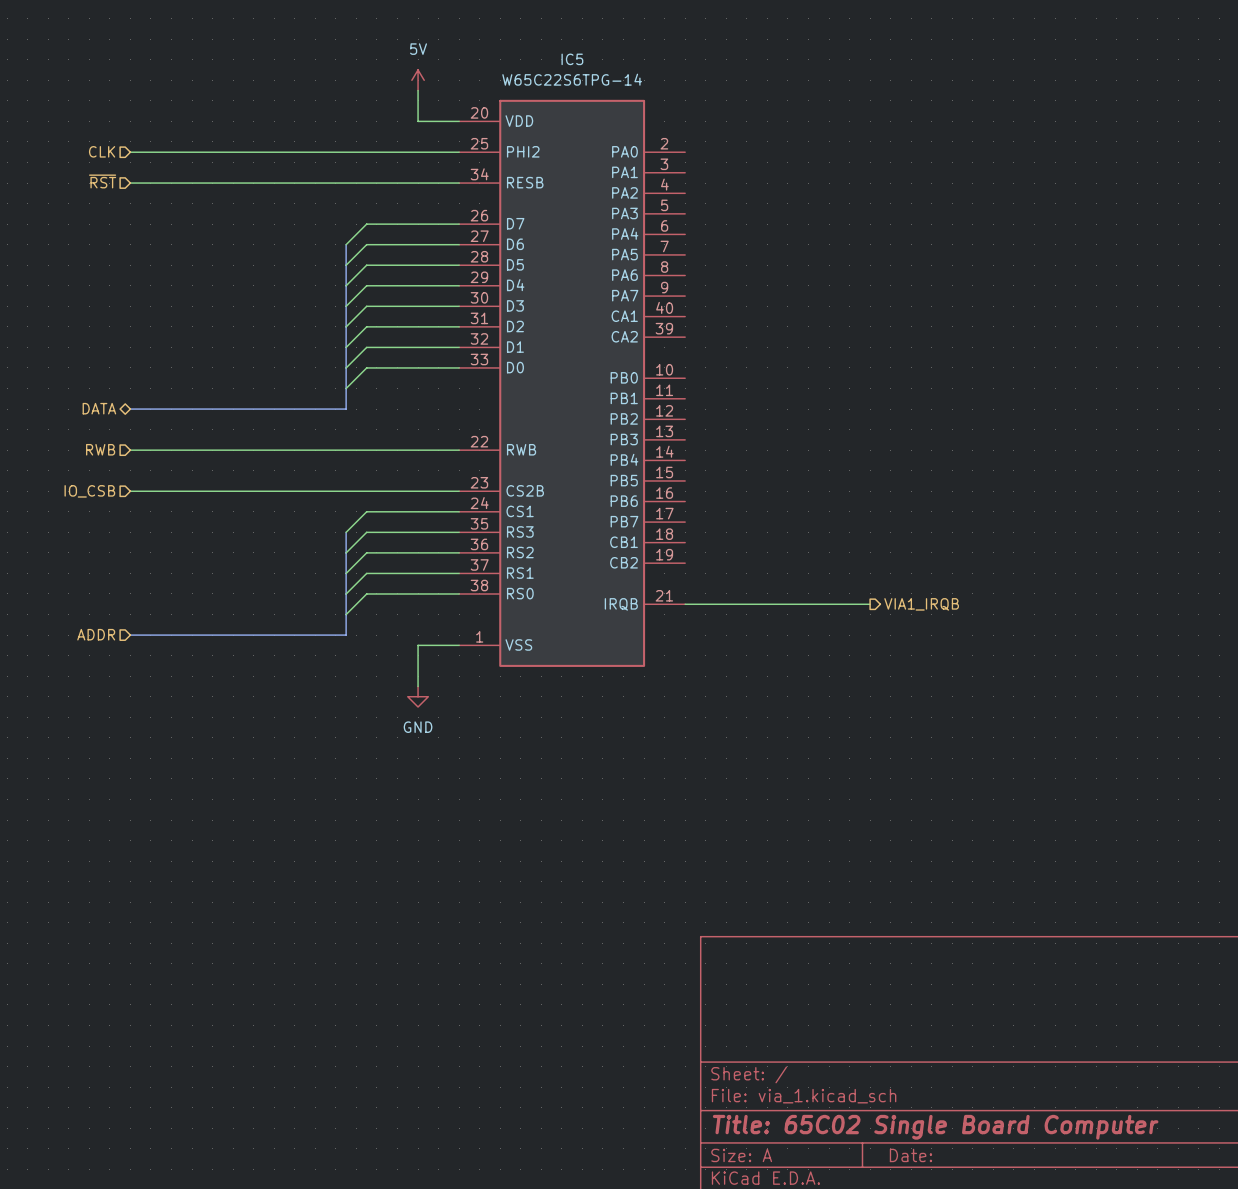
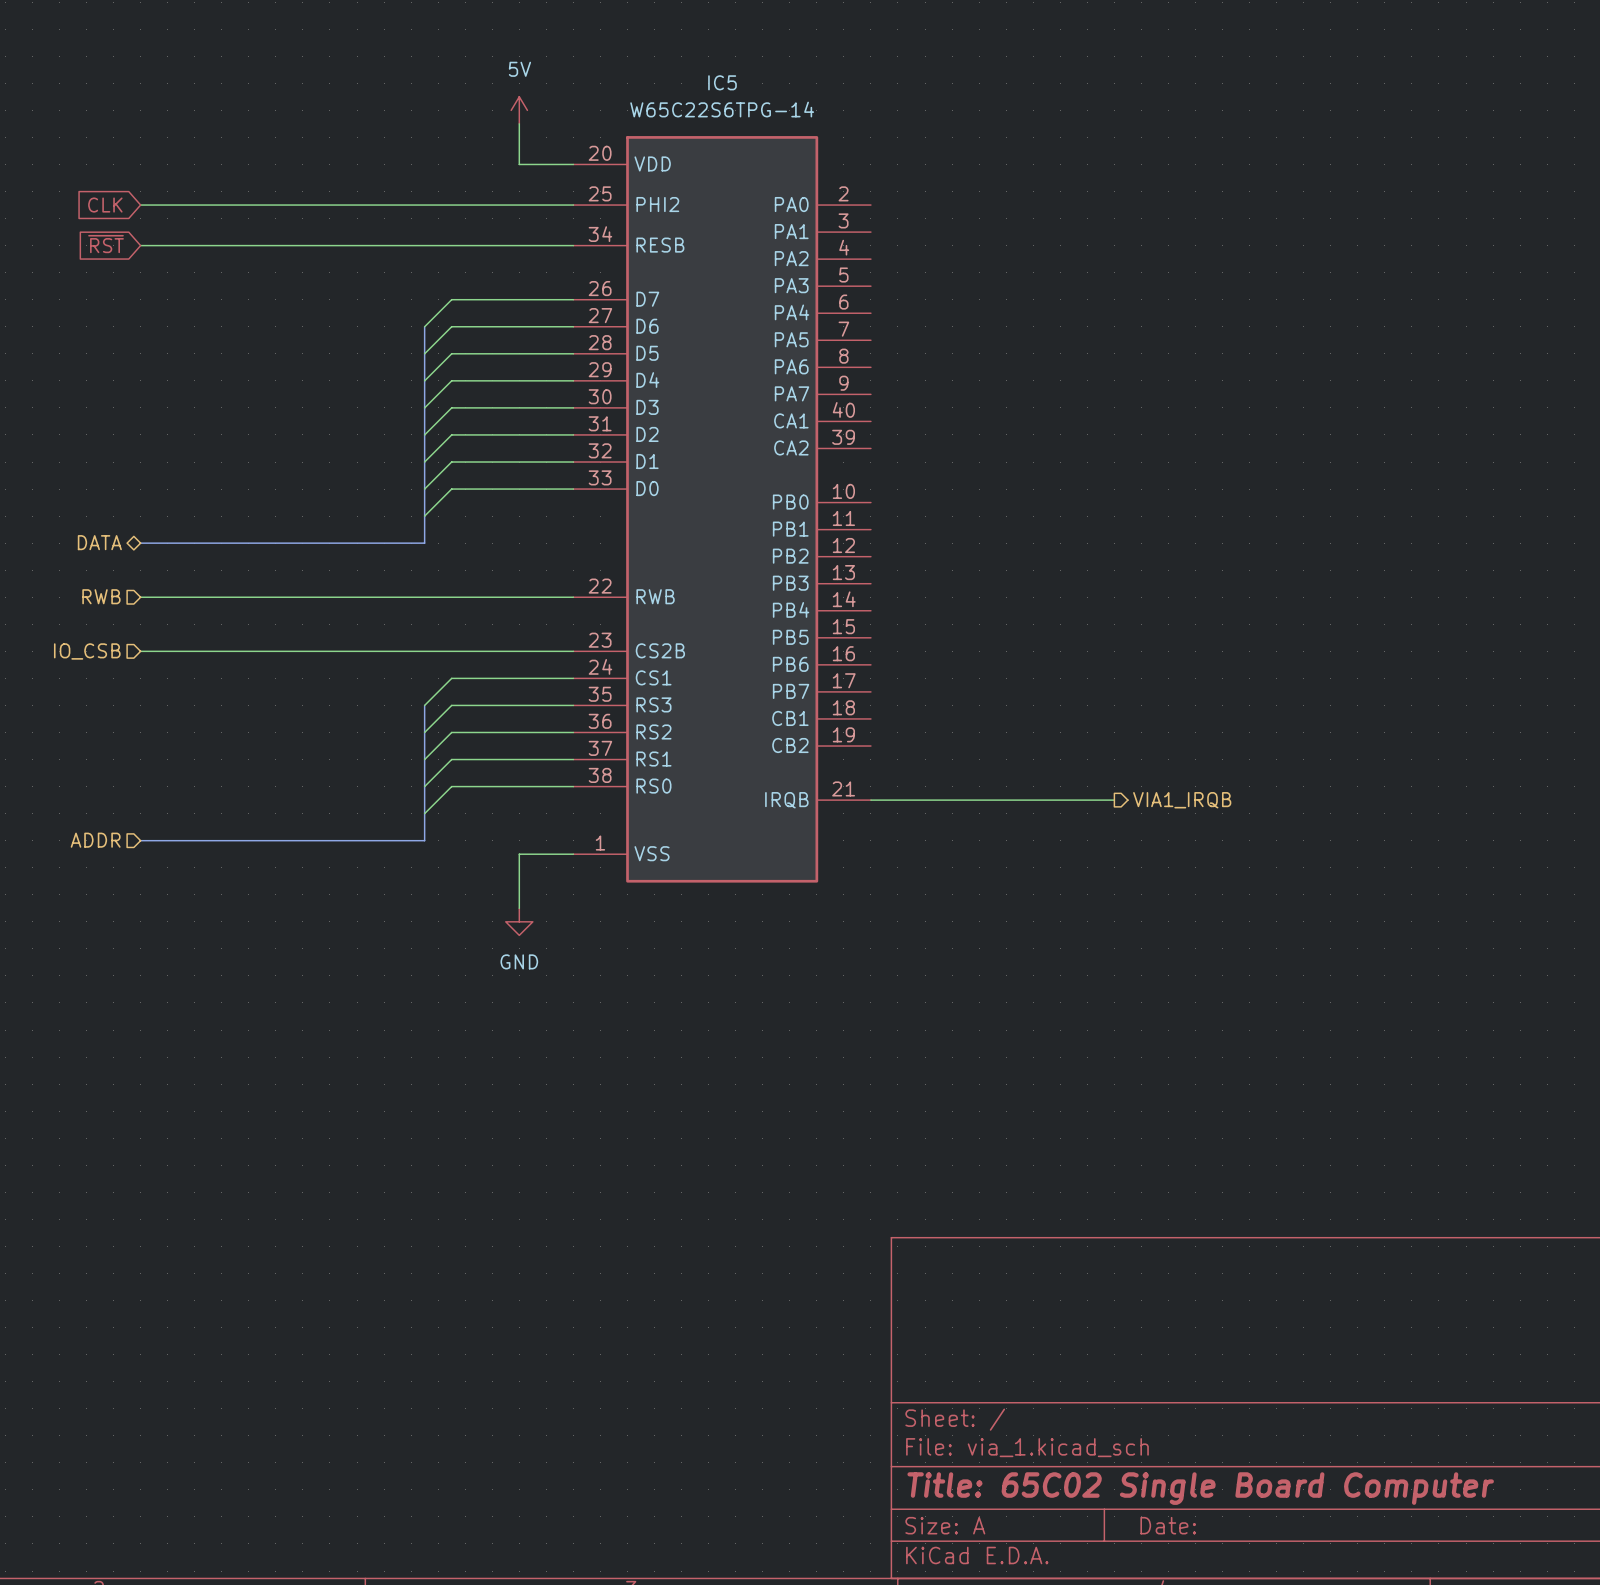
hierarchical label: CLK (102, 151) -> none
global label: none -> CLK (105, 205)
hierarchical label: ~{RST} (102, 181) -> none
global label: none -> ~{RST} (106, 244)

